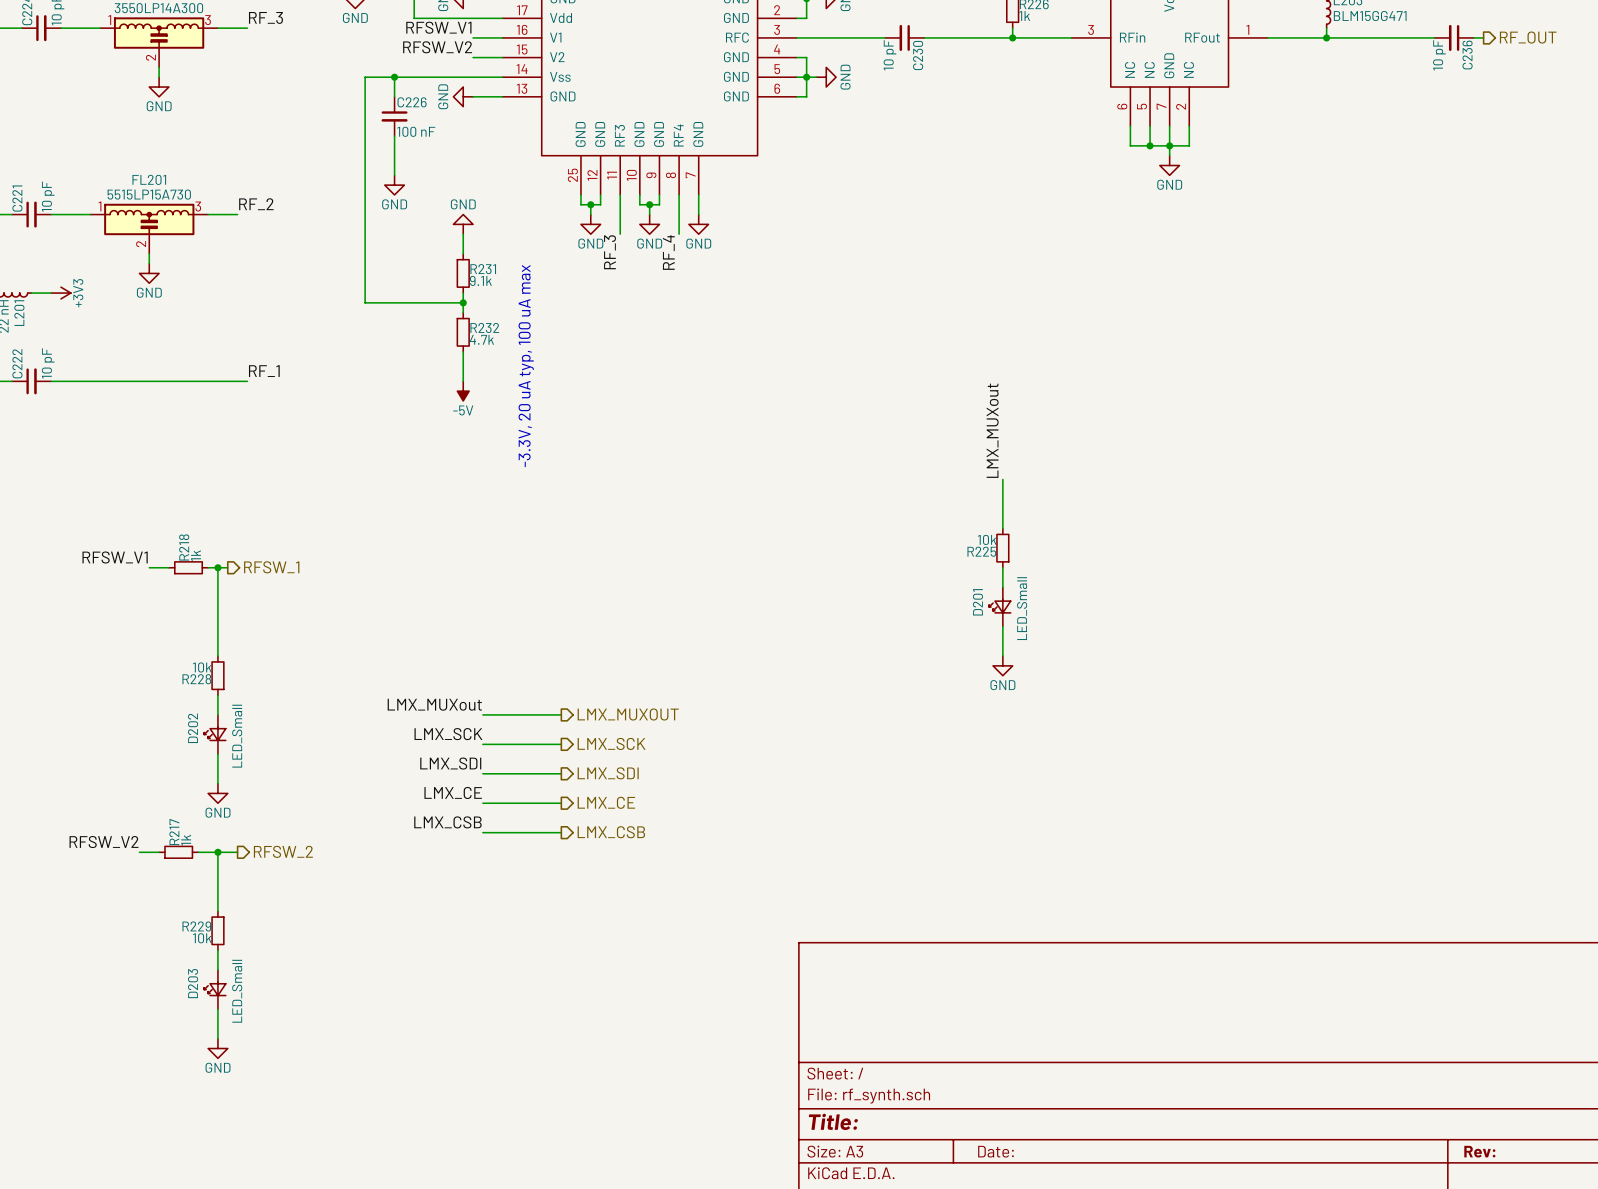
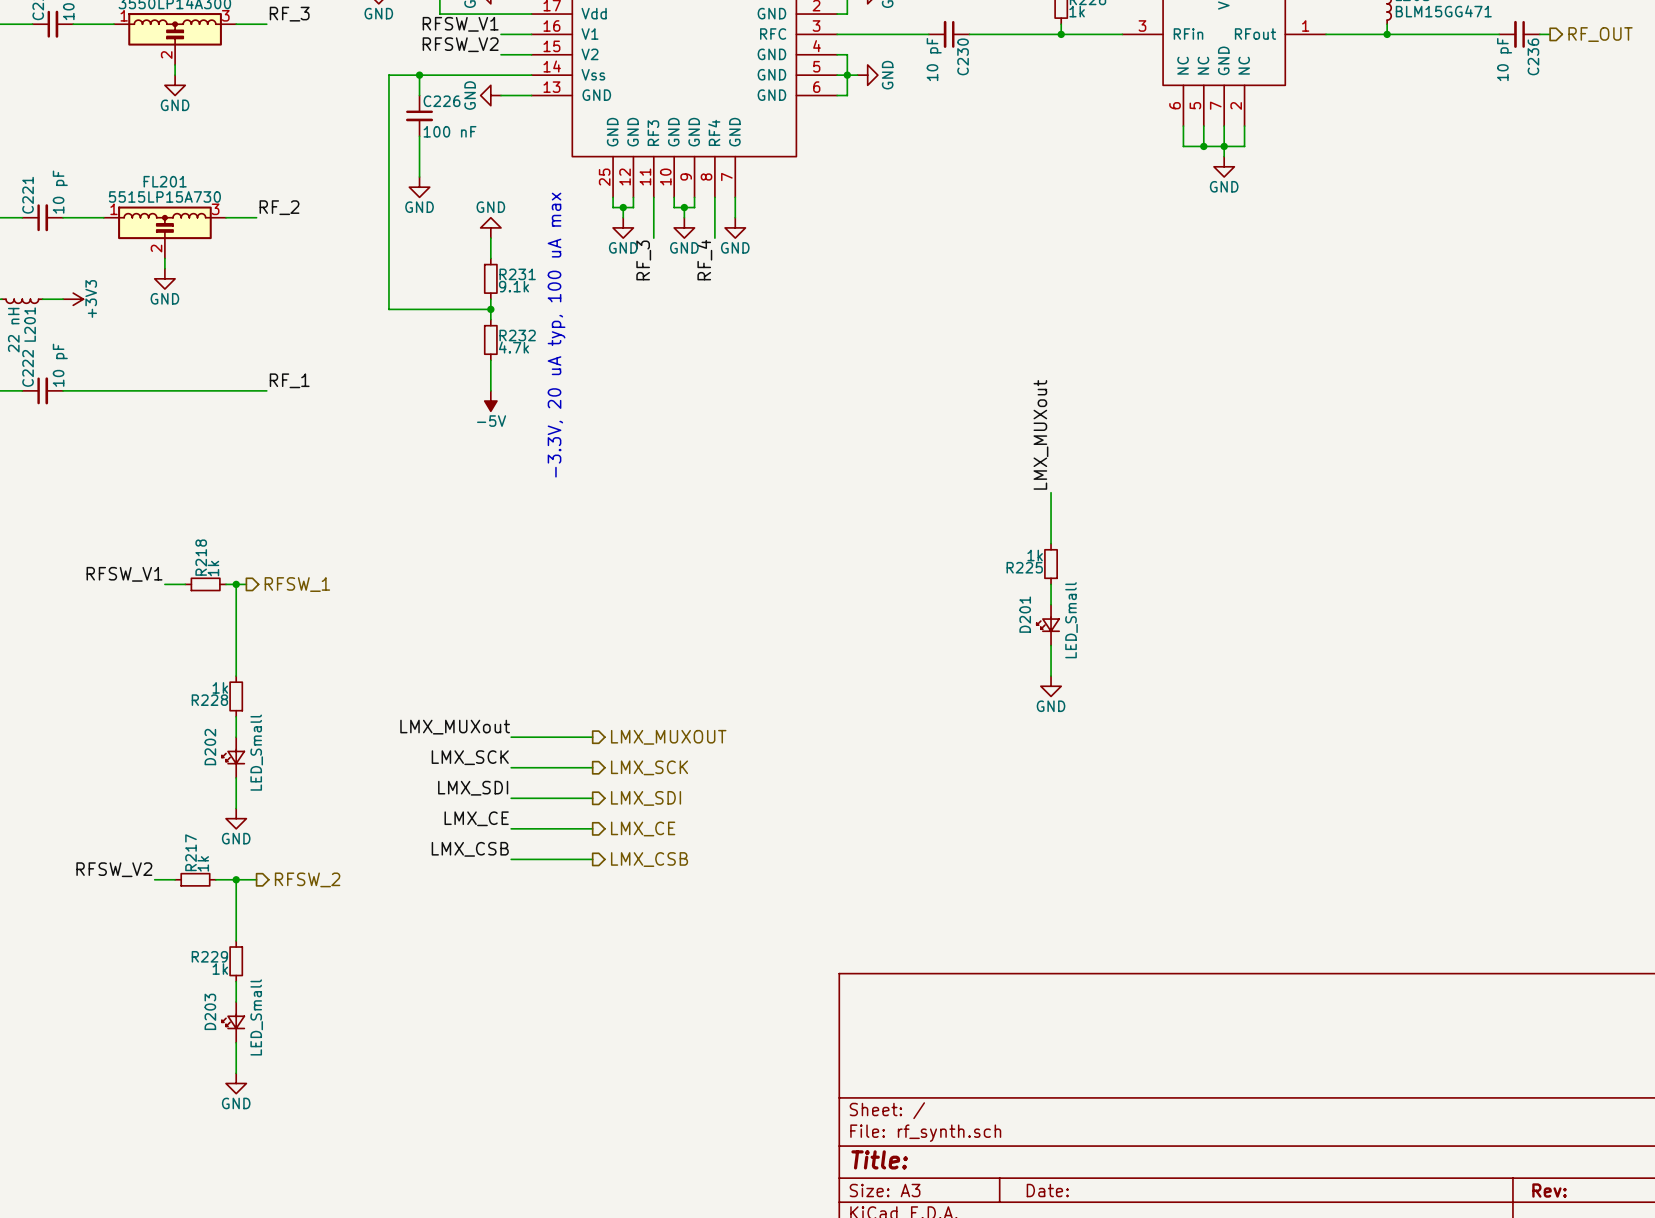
R225 value: 10k (987, 539) -> 1k (1035, 555)
R228 value: 10k (202, 667) -> 1k (220, 687)
R229 value: 10k (202, 938) -> 1k (220, 969)

